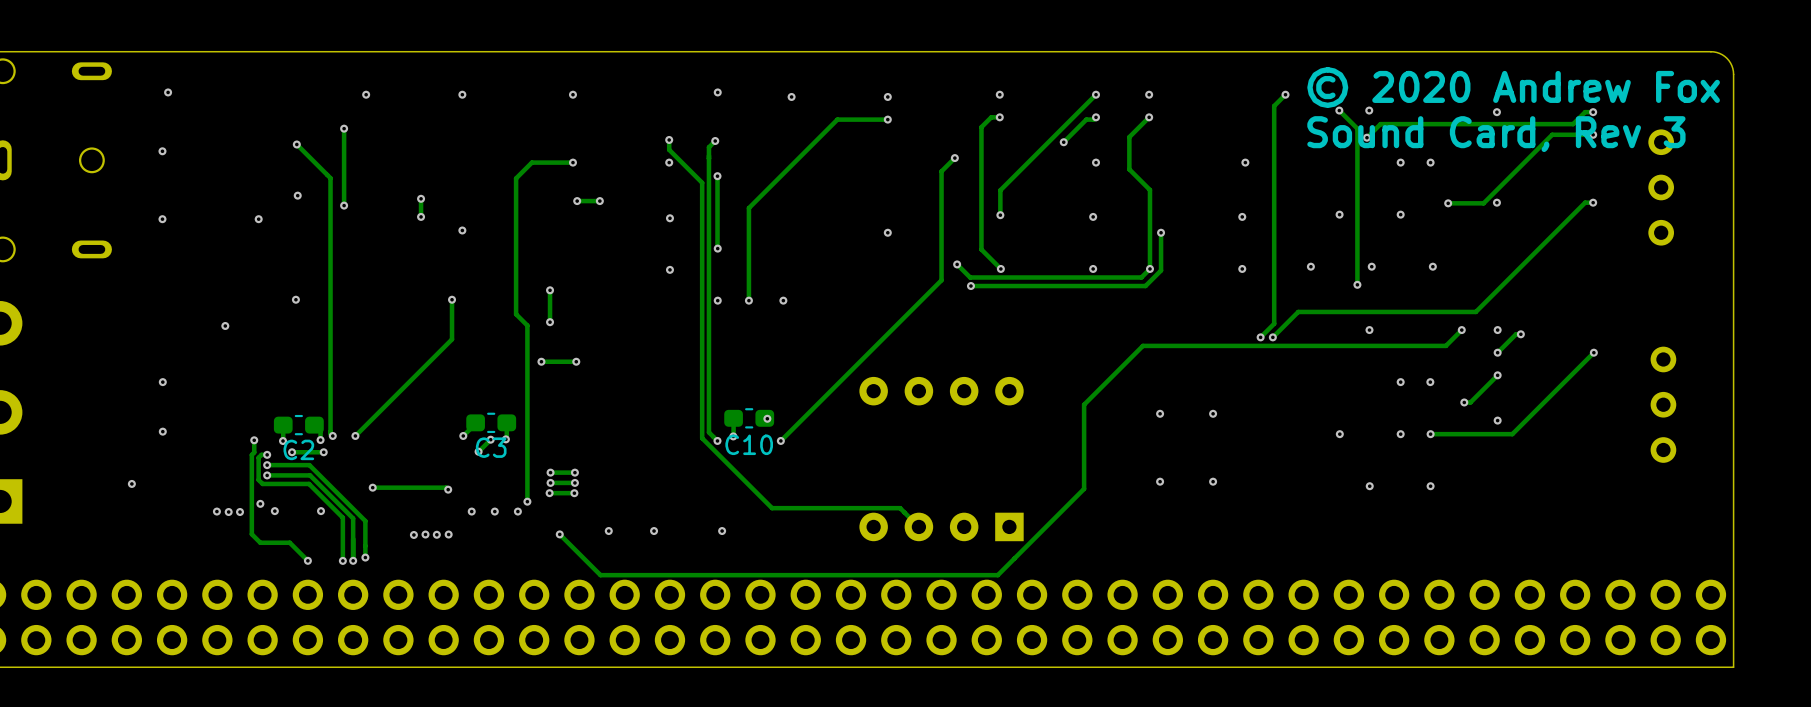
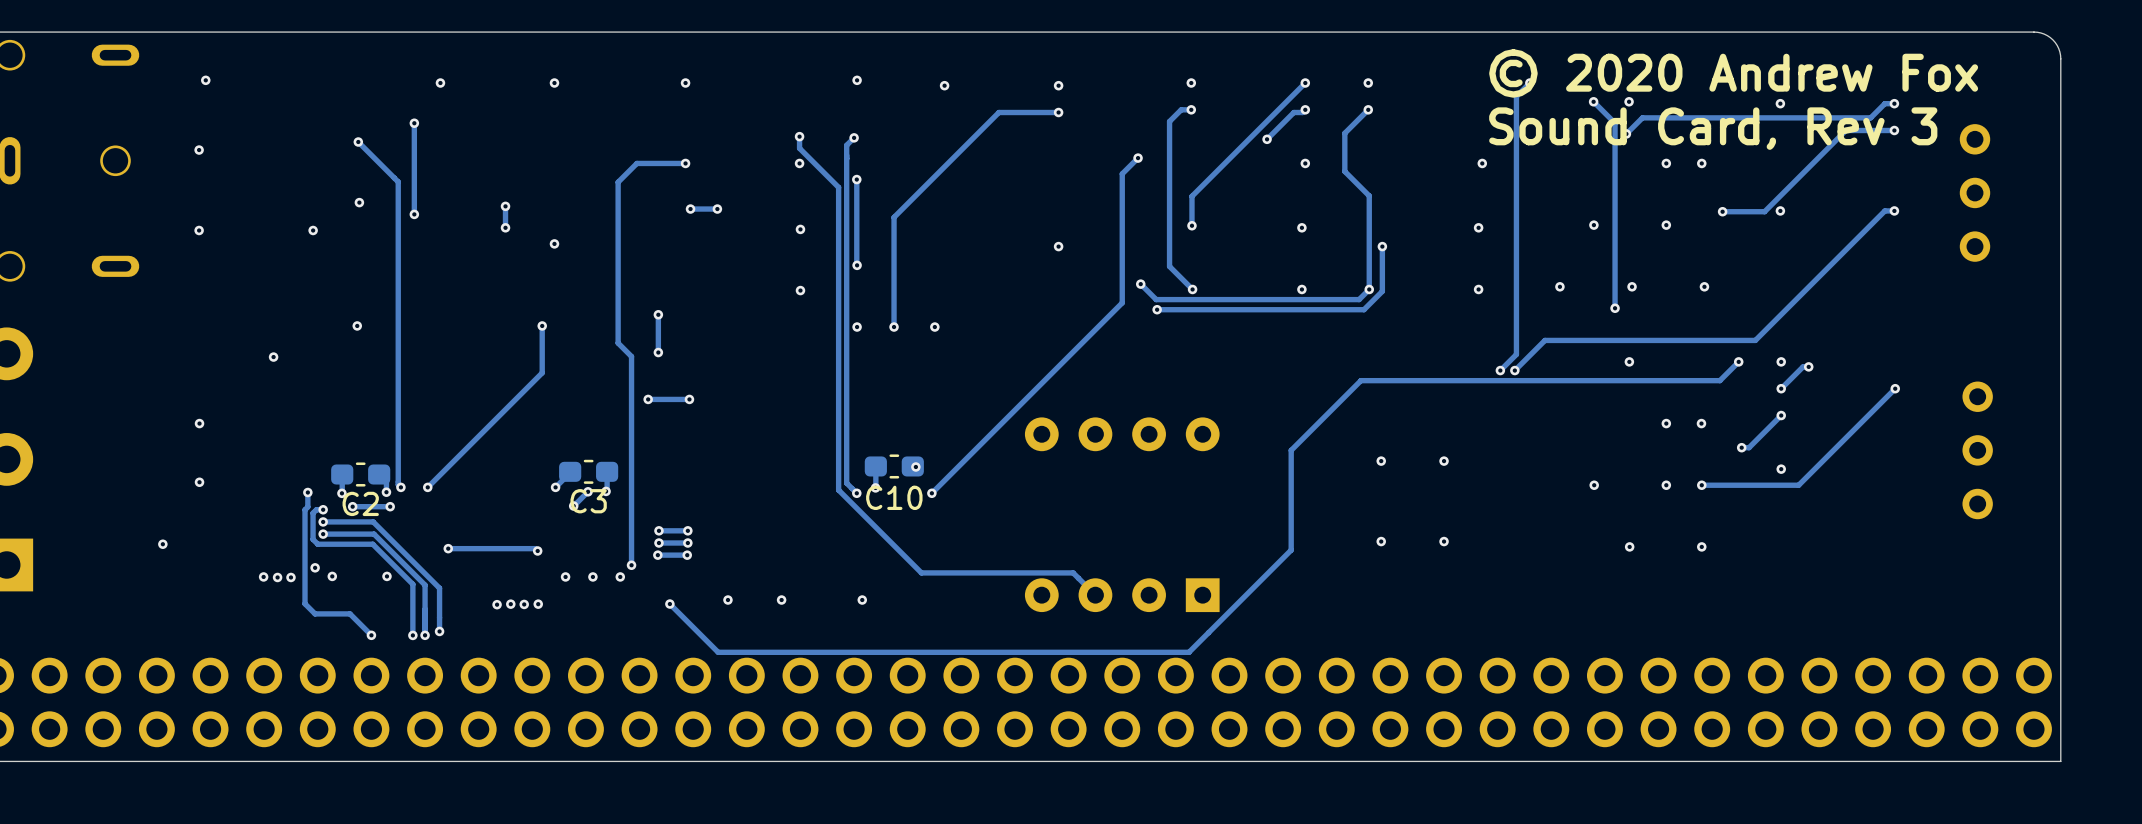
text position: © 2020 Andrew Fox (1513, 87) -> © 2020 Andrew Fox (1733, 73)
text position: Sound Card, Rev 3 (1496, 134) -> Sound Card, Rev 3 (1713, 128)

